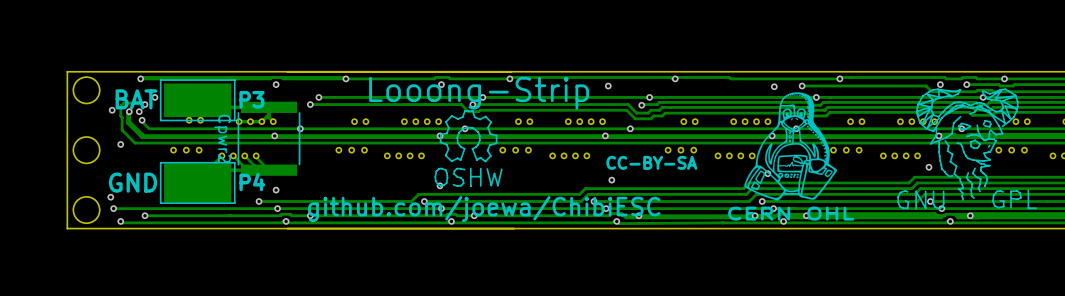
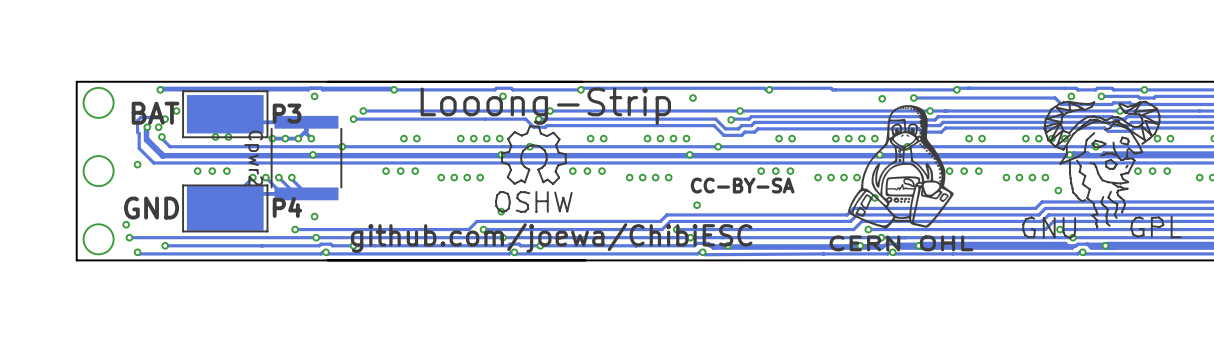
via: (112, 110) -> none

